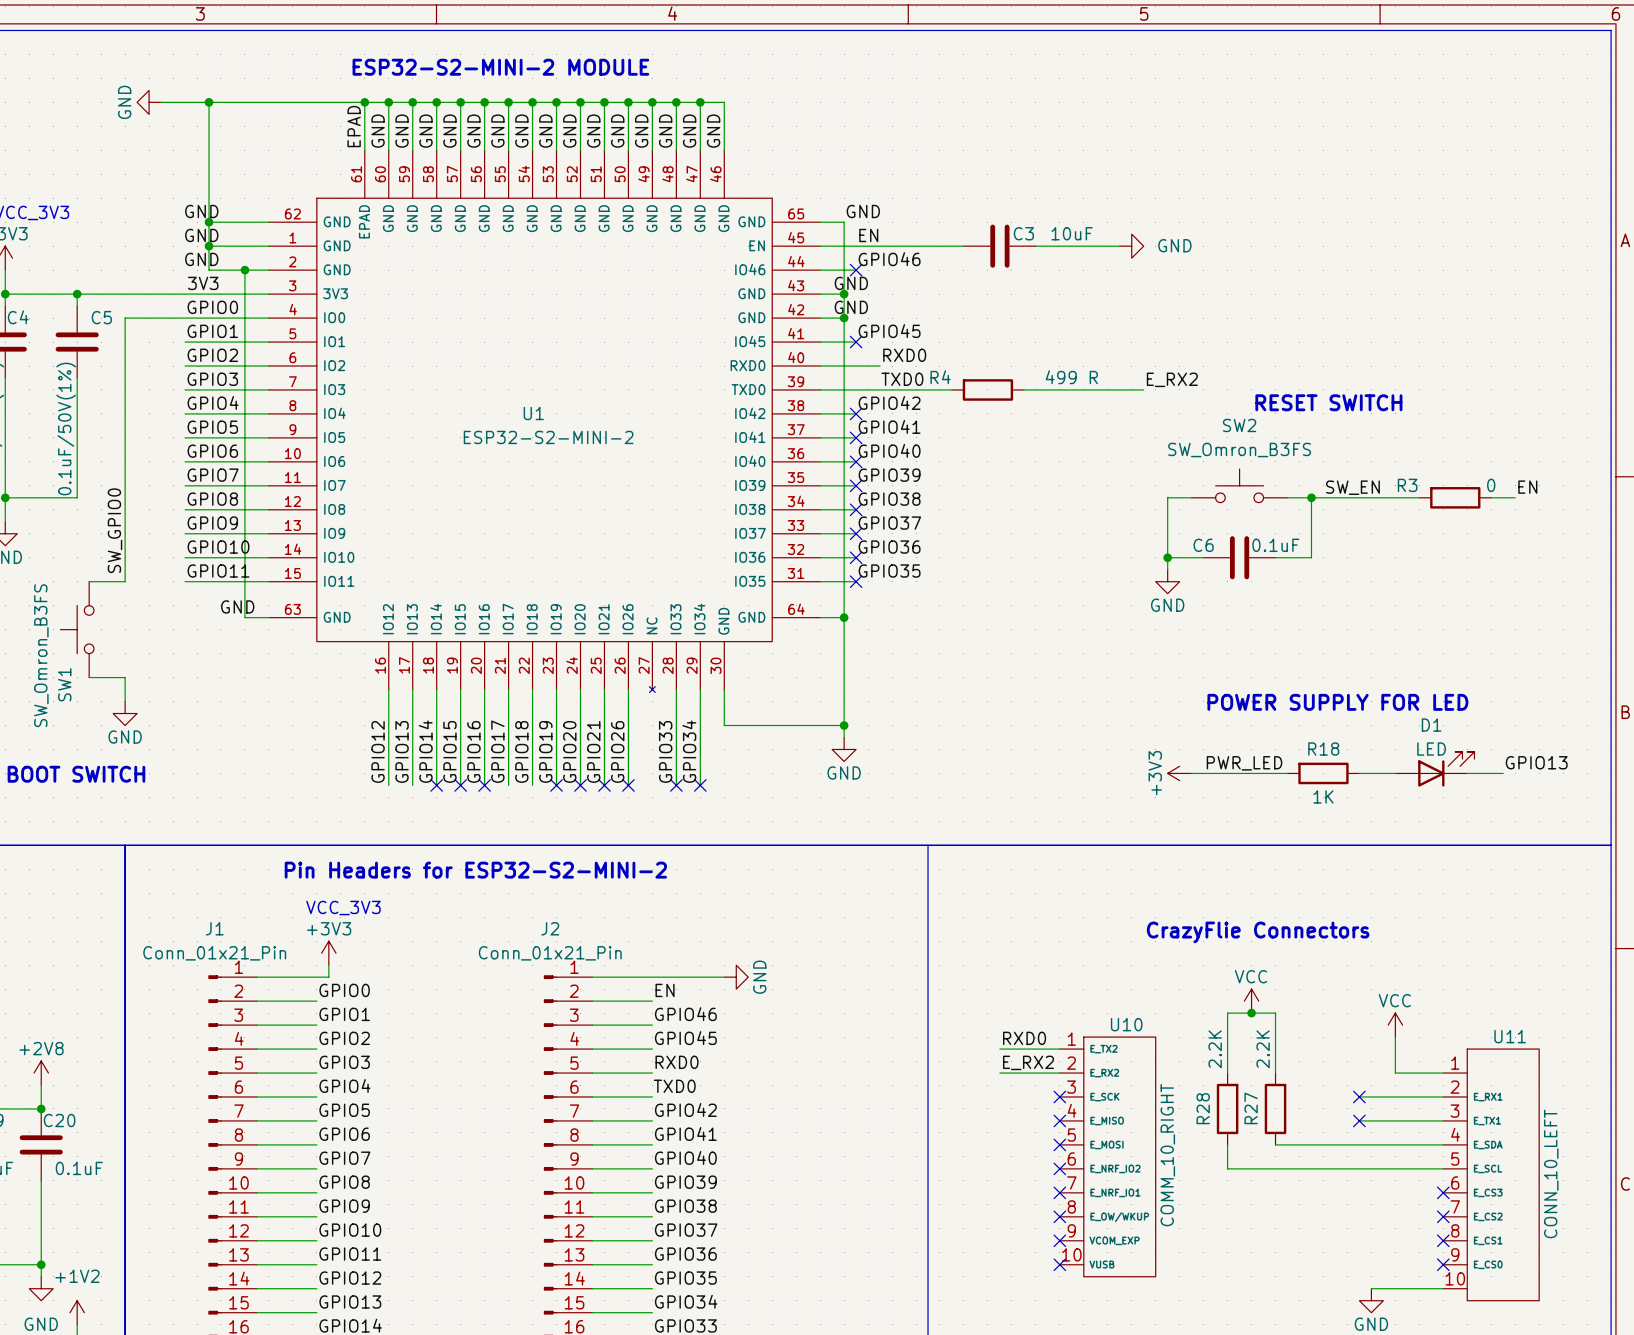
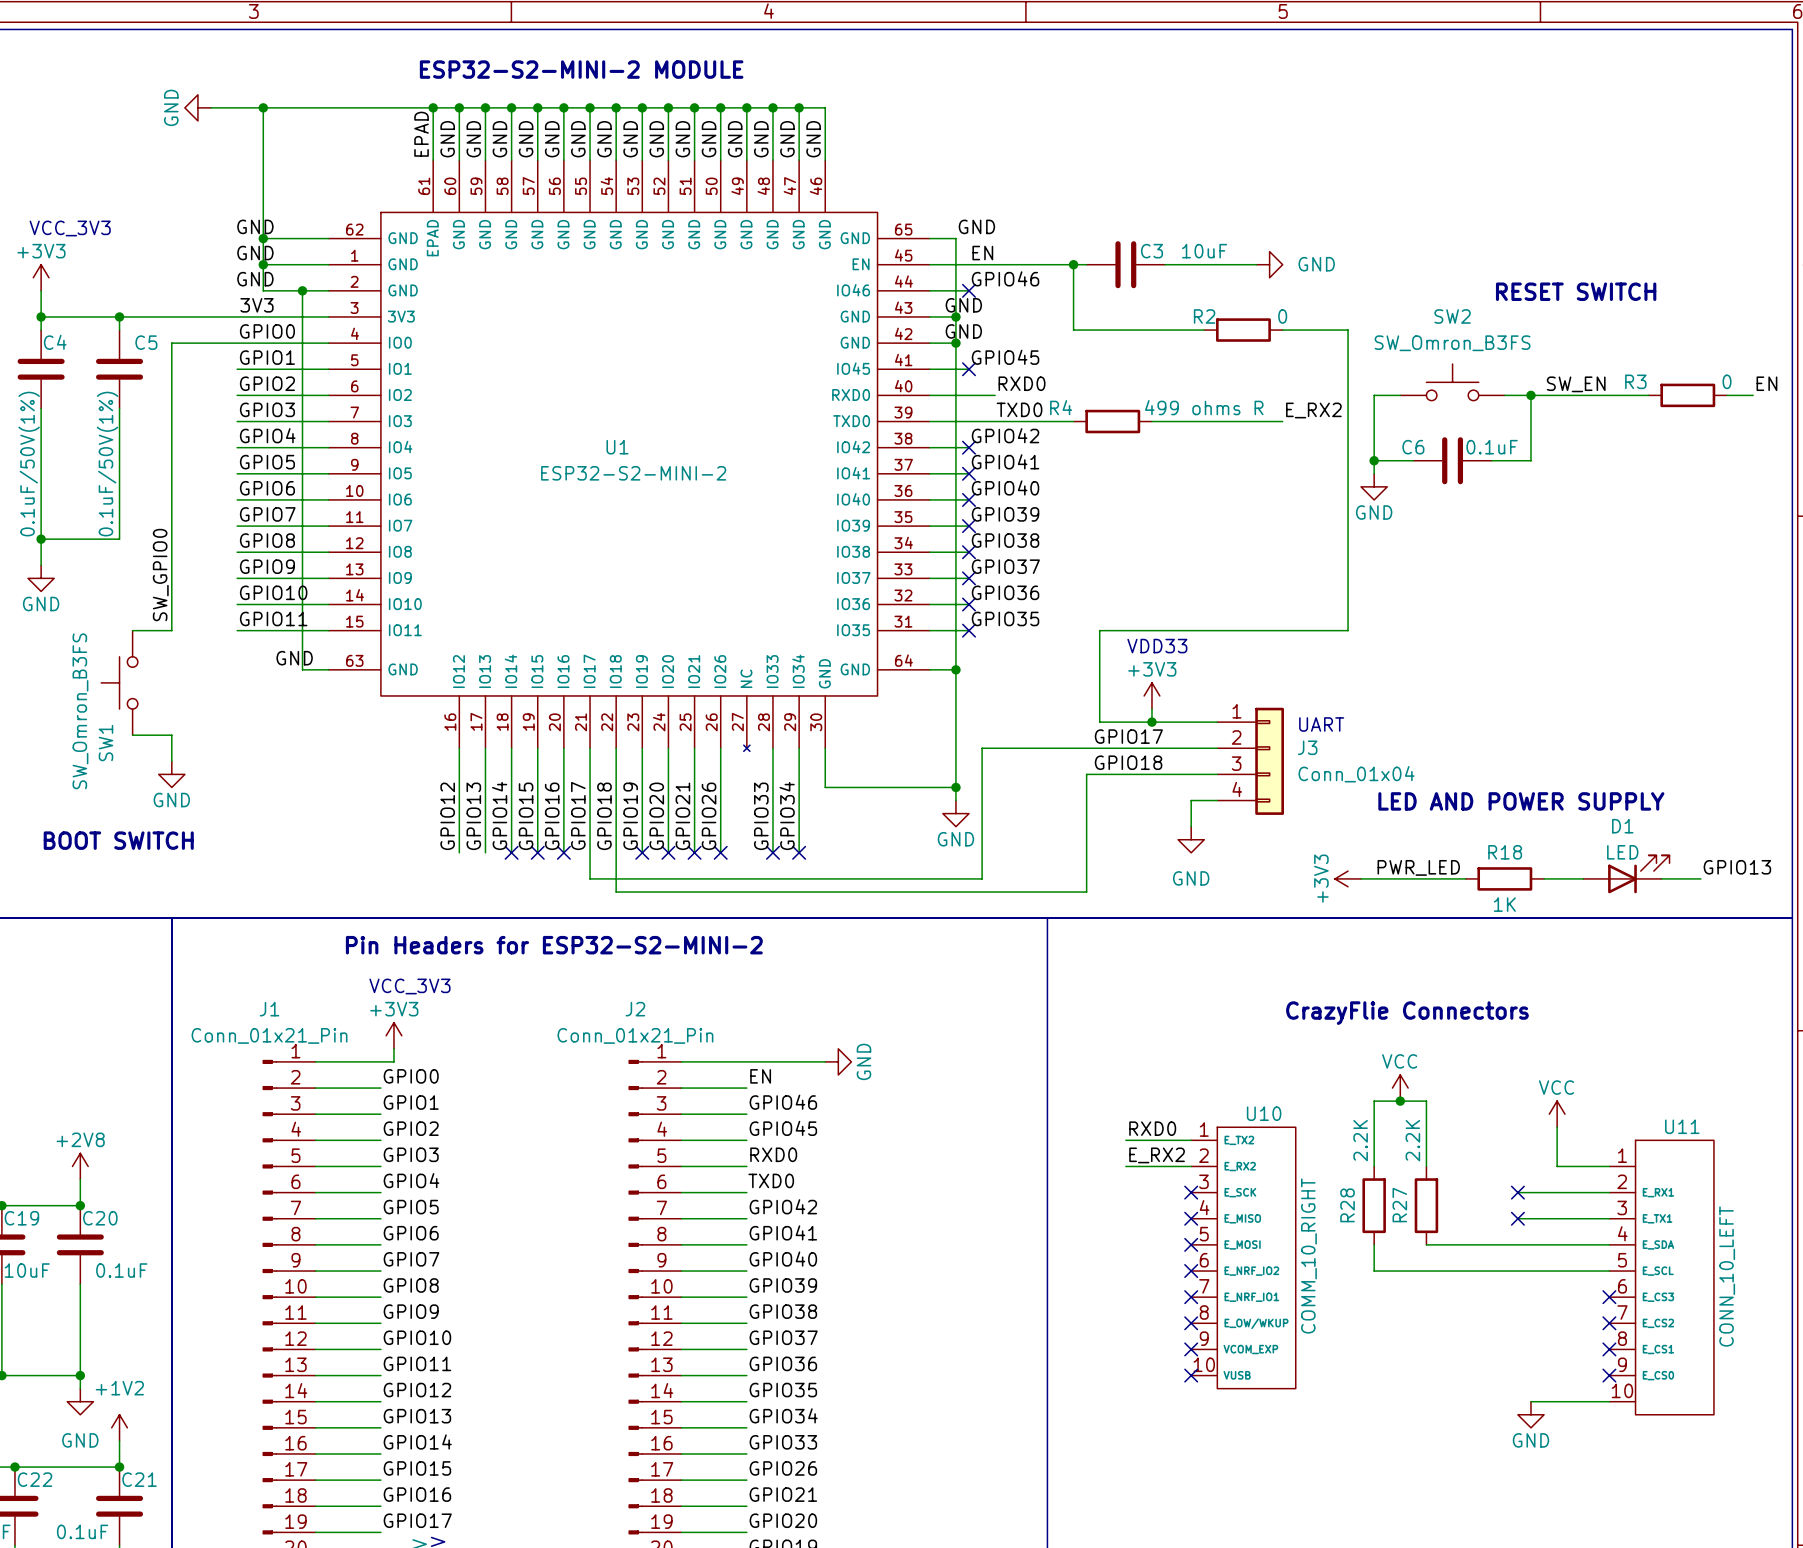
wire: none -> (1073, 264) (1073, 330) (1204, 330)
junction: none -> (1073, 264)
R2: none -> 0 (1243, 330)
wire: none -> (1282, 330) (1348, 330) (1348, 630) (1099, 630) (1099, 722) (1217, 722)
junction: none -> (1530, 395)
R4 value: 499 R (1071, 377) -> 499 ohms R (1204, 407)
text position: RESET SWITCH (1328, 402) -> RESET SWITCH (1576, 291)
junction: none -> (1374, 460)
power symbol: none -> GND (1374, 486)
SW2 position: (1239, 485) -> (1452, 382)
label position: SW_EN (1352, 487) -> SW_EN (1576, 384)
label position: EN (1527, 487) -> EN (1766, 383)
wire: (1191, 497) (1167, 497) (1167, 569) -> (1400, 395) (1374, 395) (1374, 473)
wire: (1287, 497) (1419, 497) -> (1504, 395) (1648, 395)
wire: (1311, 497) (1311, 557) (1275, 557) -> (1530, 395) (1530, 460) (1491, 460)
junction: (1311, 497) -> none
R3 position: (1455, 497) -> (1687, 395)
wire: (1491, 497) (1515, 497) -> (1727, 395) (1753, 395)
wire: (1167, 557) (1203, 557) -> (1374, 460) (1413, 460)
junction: (1167, 557) -> none
C6 position: (1239, 557) -> (1452, 460)
power symbol: GND (1167, 581) -> none
text: none -> VDD33 (1157, 646)
power symbol: none -> +3V3 (1151, 695)
wire: none -> (1151, 709) (1151, 722)
junction: none -> (1151, 722)
text: none -> UART (1321, 724)
label: none -> GPIO17 (1128, 736)
wire: none -> (1217, 748) (982, 748) (982, 878) (590, 878) (590, 852)
J3: none -> Conn_01x04 (1250, 761)
label: none -> GPIO18 (1128, 762)
text: POWER SUPPLY FOR LED (1337, 702) -> none
wire: none -> (1217, 774) (1086, 774) (1086, 892) (616, 892) (616, 852)
wire: none -> (1217, 800) (1191, 800) (1191, 826)
text: none -> LED AND POWER SUPPLY (1521, 801)
label position: GPIO13 (1536, 762) -> GPIO13 (1737, 867)
label position: PWR_LED (1244, 763) -> PWR_LED (1418, 867)
D1 position: (1434, 769) -> (1626, 874)
power symbol: none -> GND (1191, 839)
power symbol position: +3V3 (1179, 773) -> +3V3 (1348, 878)
wire: (1191, 773) (1287, 773) -> (1361, 878) (1465, 878)
R18 position: (1323, 773) -> (1504, 878)
wire: (1359, 773) (1395, 773) -> (1544, 878) (1583, 878)
wire: (1467, 773) (1503, 773) -> (1661, 878) (1700, 878)

